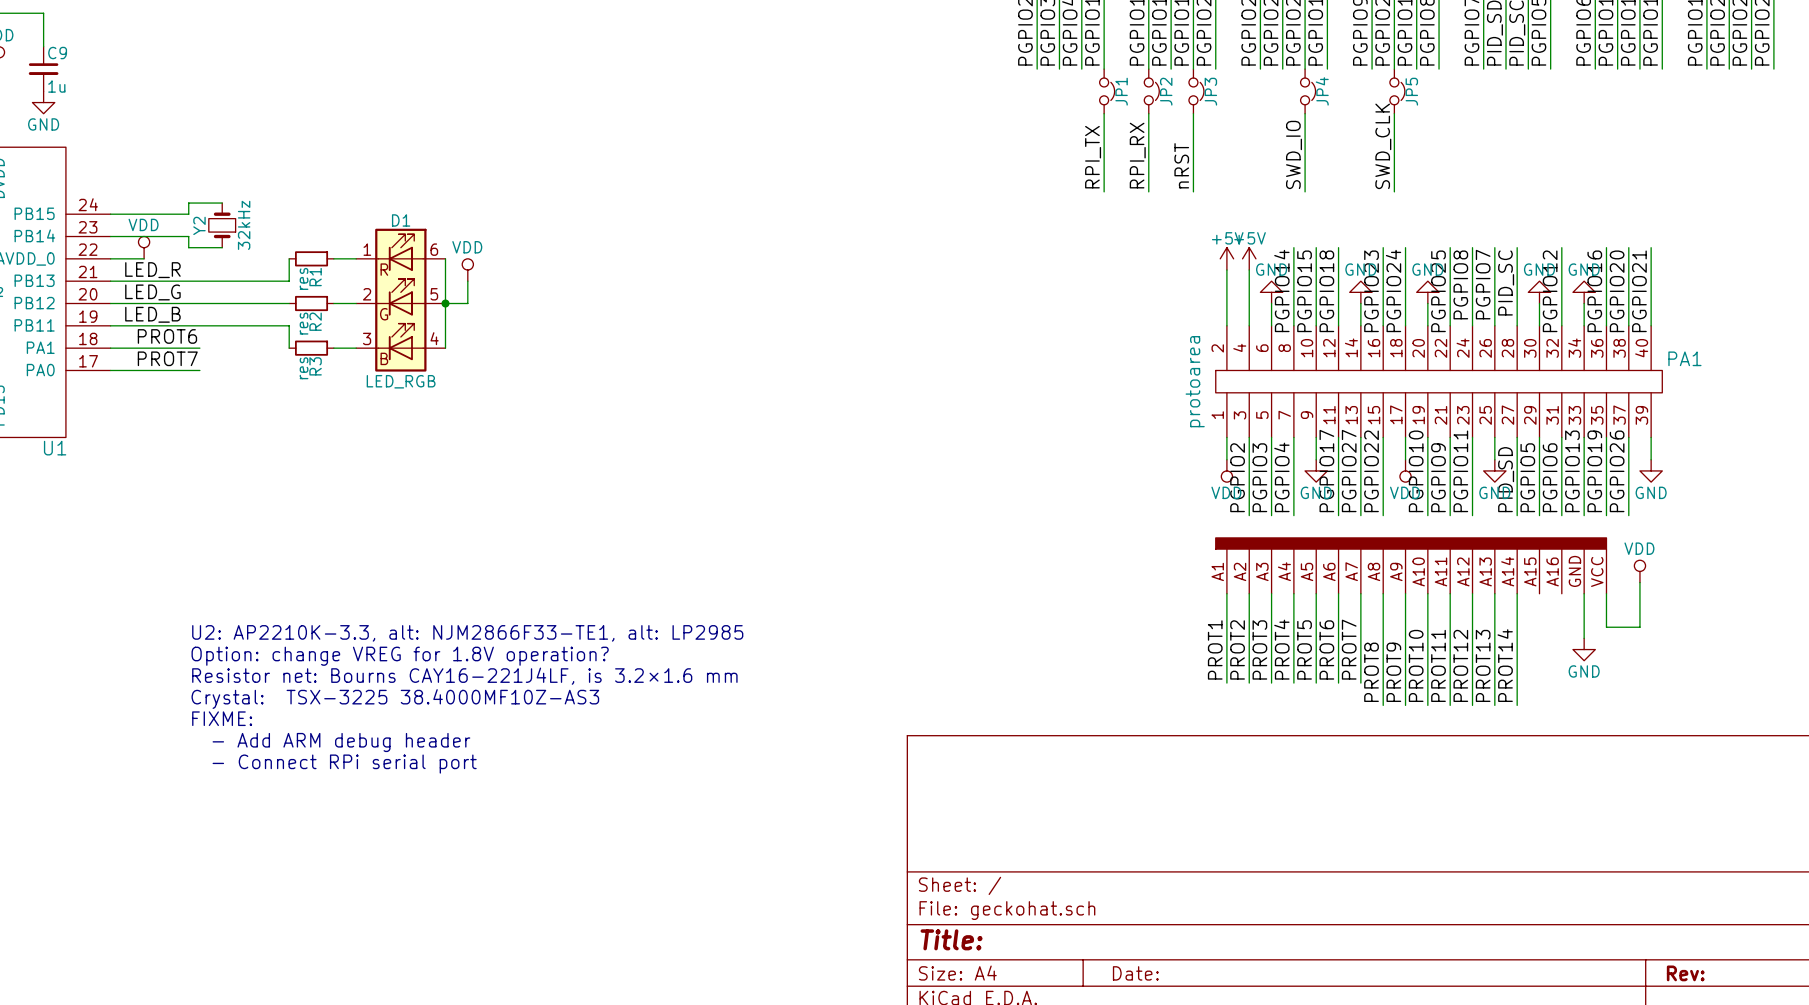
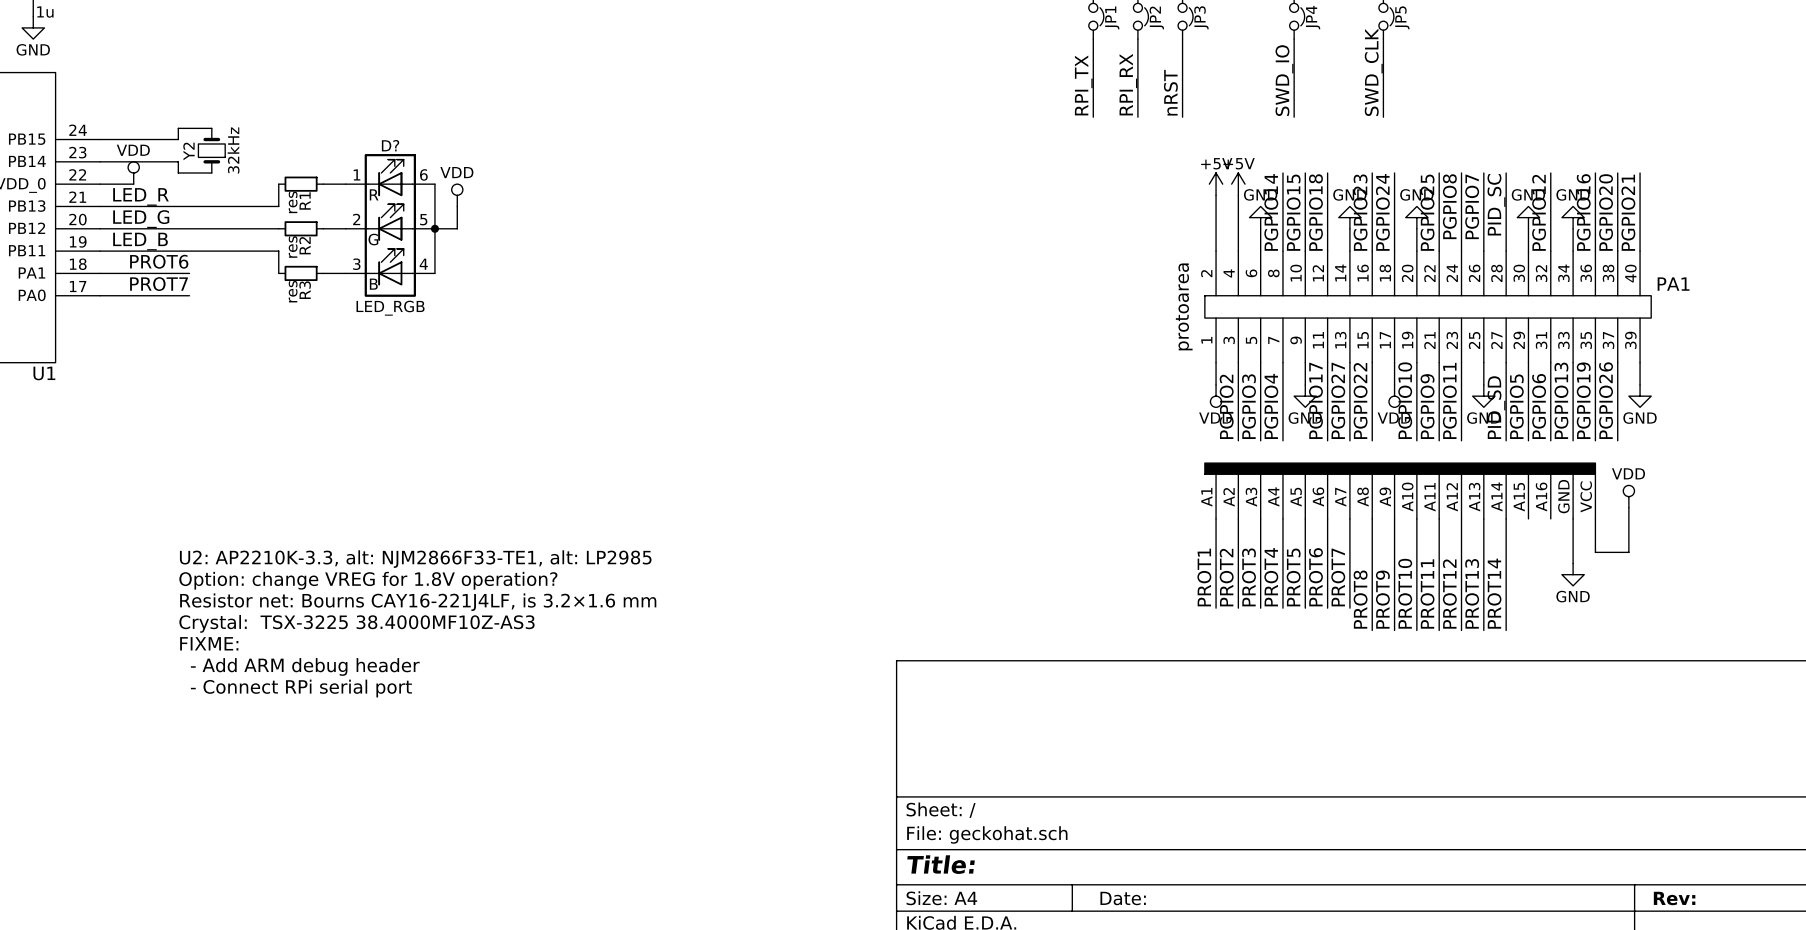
D1 name: D1 (401, 220) -> D? (390, 145)

